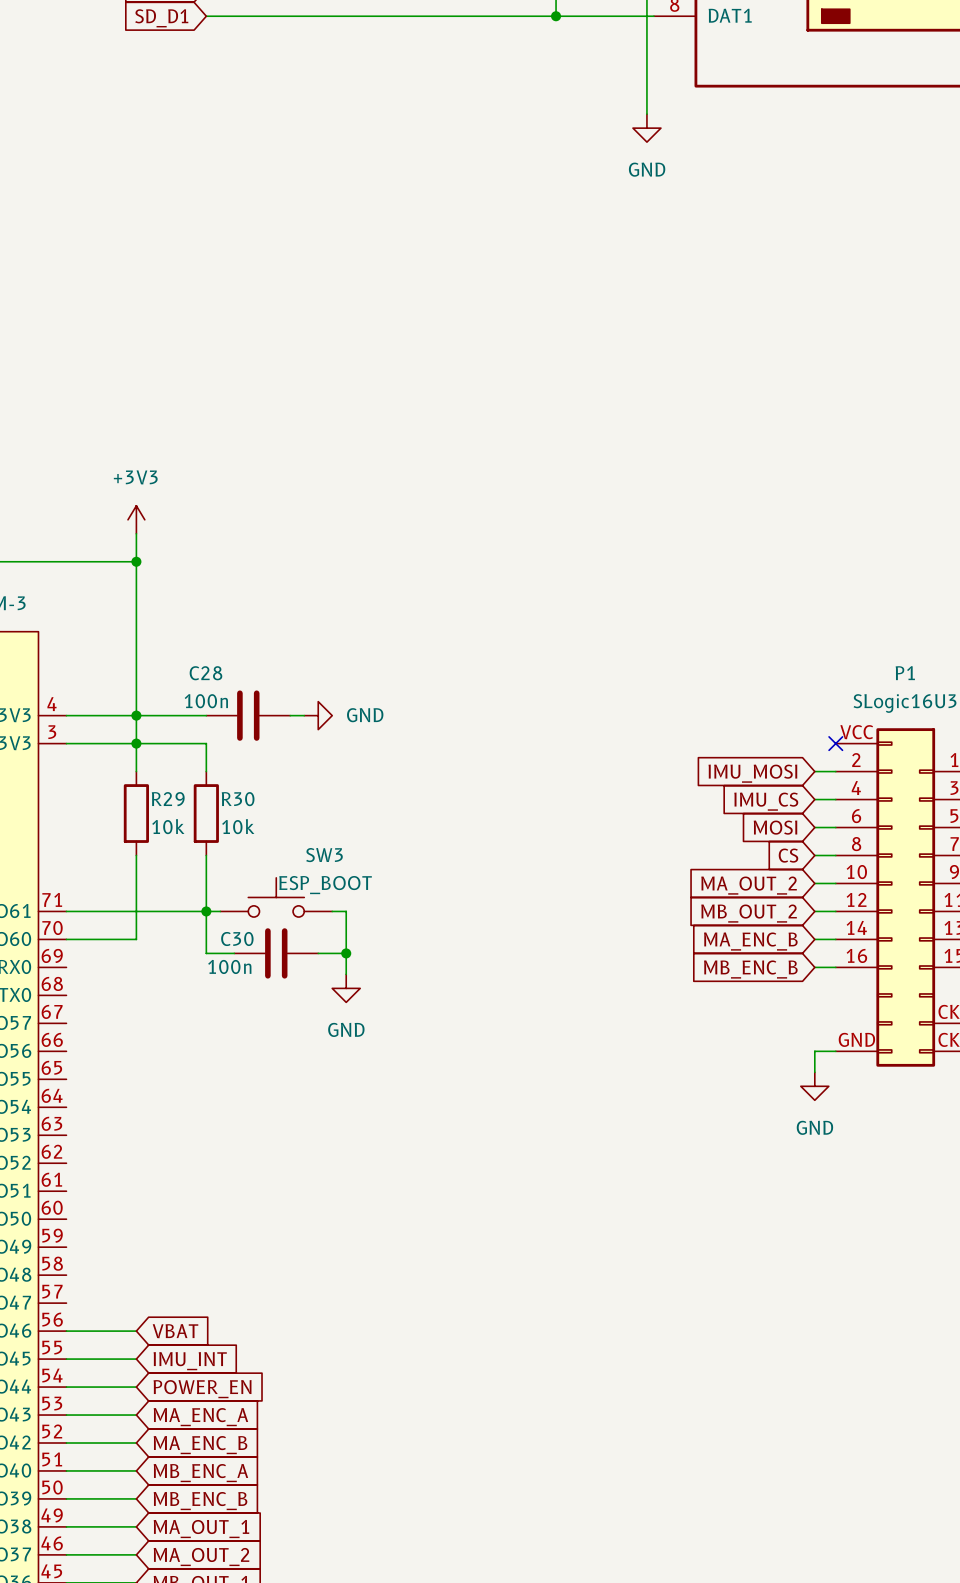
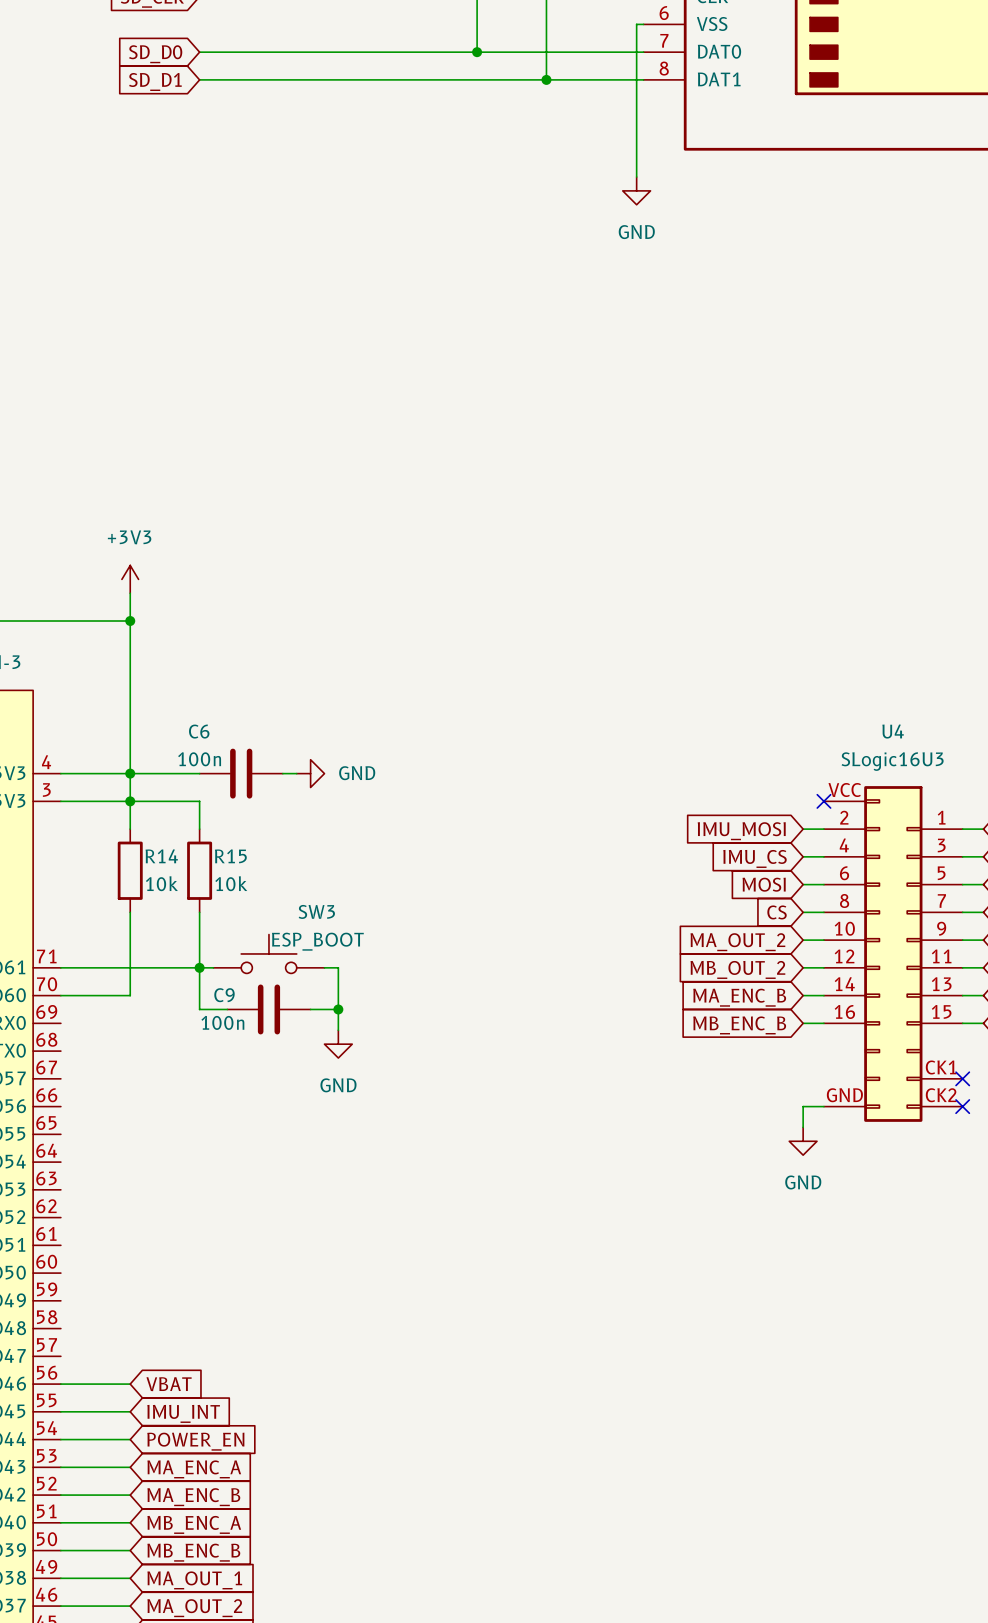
C28 name: C28 (205, 673) -> C6 (199, 731)
P1 name: P1 (905, 673) -> U4 (893, 731)
R29 name: R29 (168, 799) -> R14 (161, 856)
R30 name: R30 (238, 799) -> R15 (230, 856)
C30 name: C30 (237, 939) -> C9 (224, 995)

